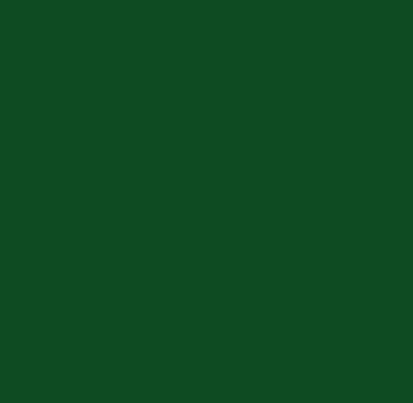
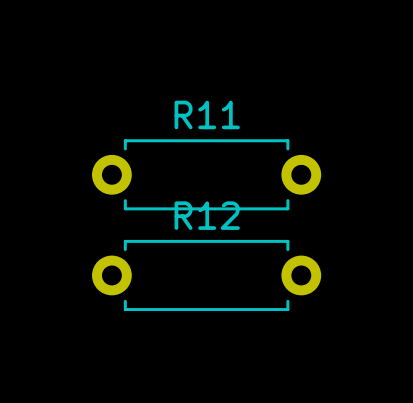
R11: none -> (206, 174)
R12: none -> (206, 275)

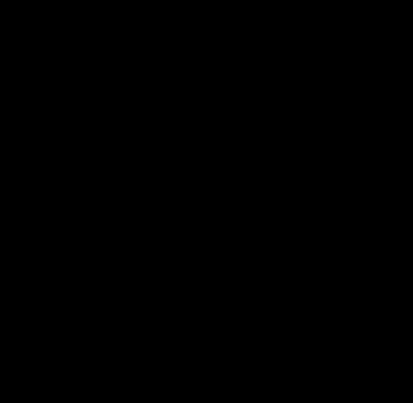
R11: (206, 174) -> none
R12: (206, 275) -> none

